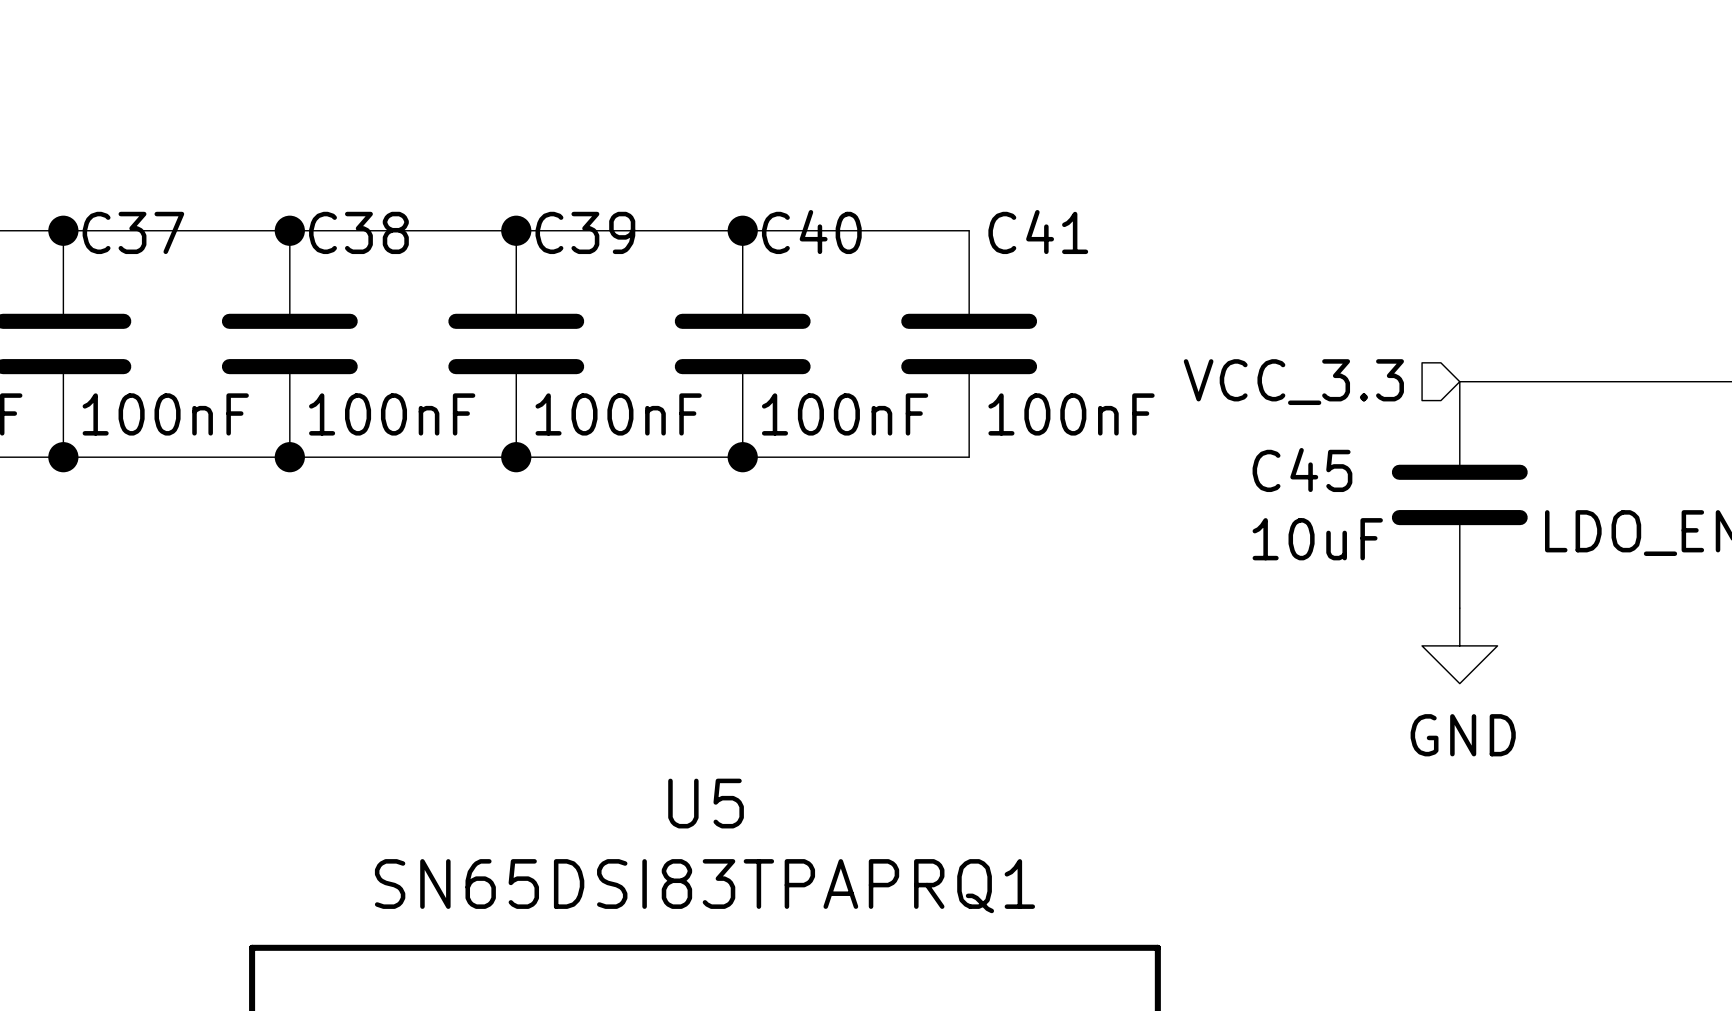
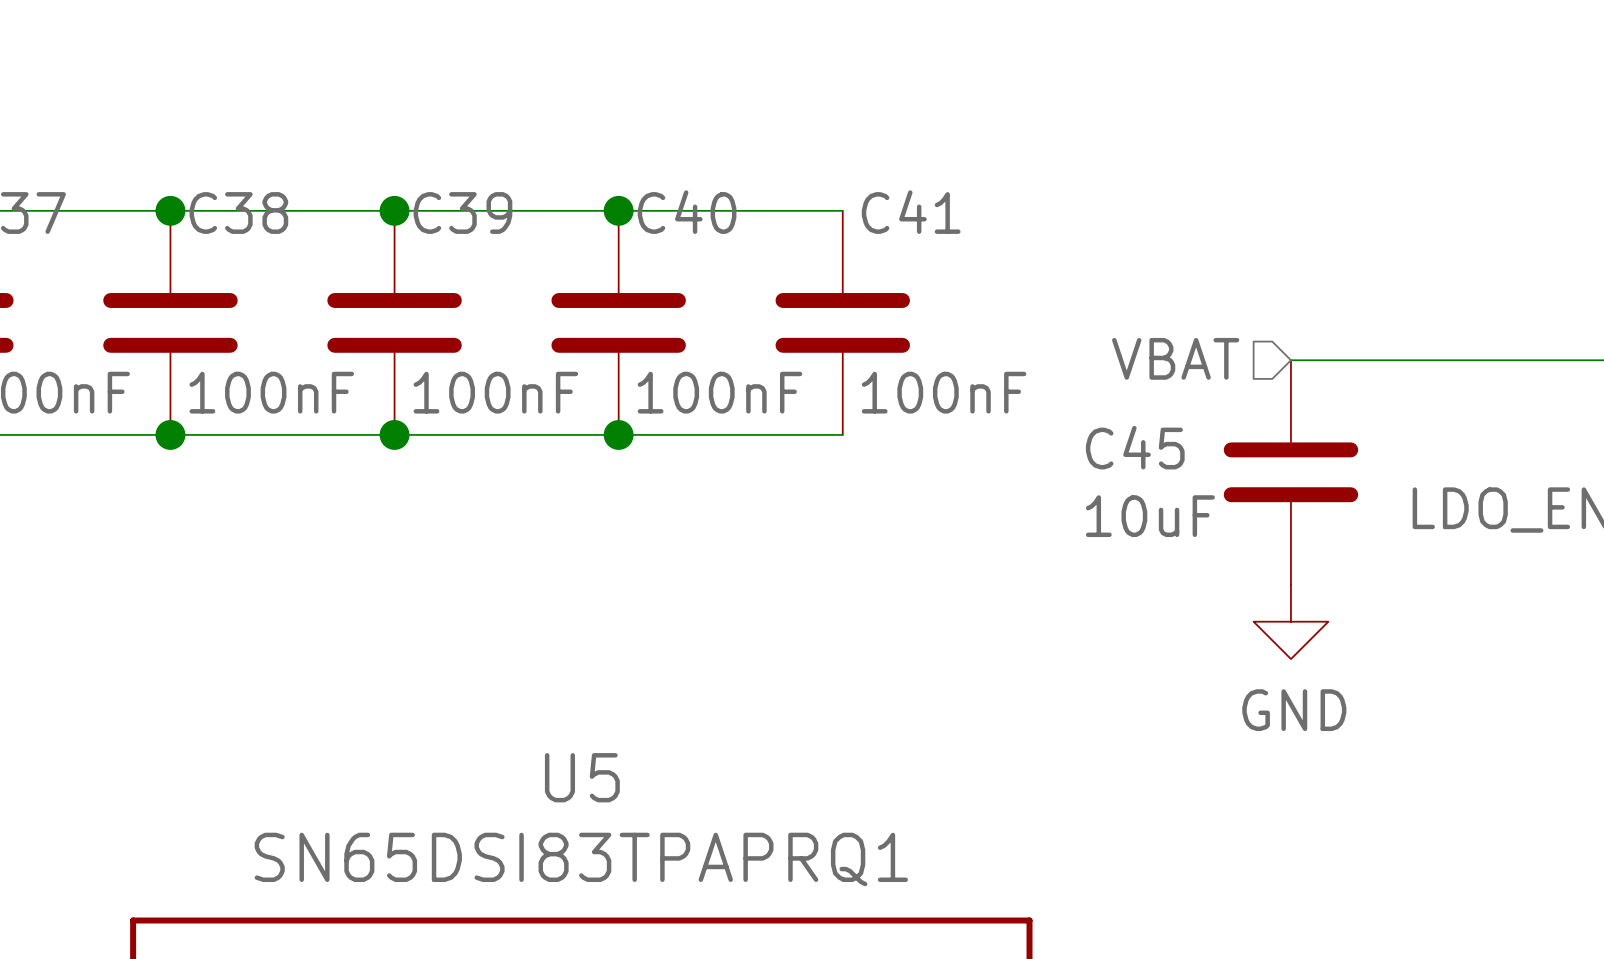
hierarchical label: none -> VBAT (1175, 358)
wire: none -> (1290, 360) (1328, 360)
hierarchical label: VCC_3.3 (1293, 382) -> none
C45 position: (1459, 494) -> (1290, 472)
power symbol position: GND (1459, 645) -> GND (1290, 621)

